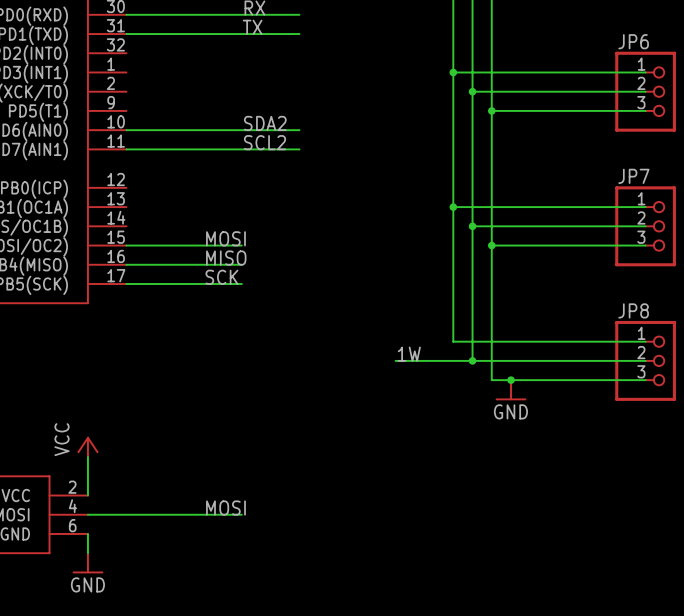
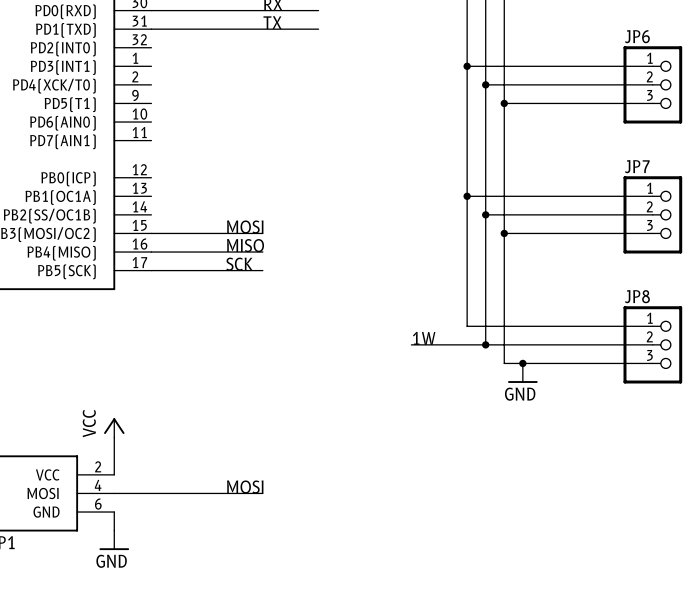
label: SDA2 (265, 123) -> none
wire: (126, 130) (299, 130) -> none
label: SCL2 (265, 142) -> none
wire: (126, 149) (299, 149) -> none

